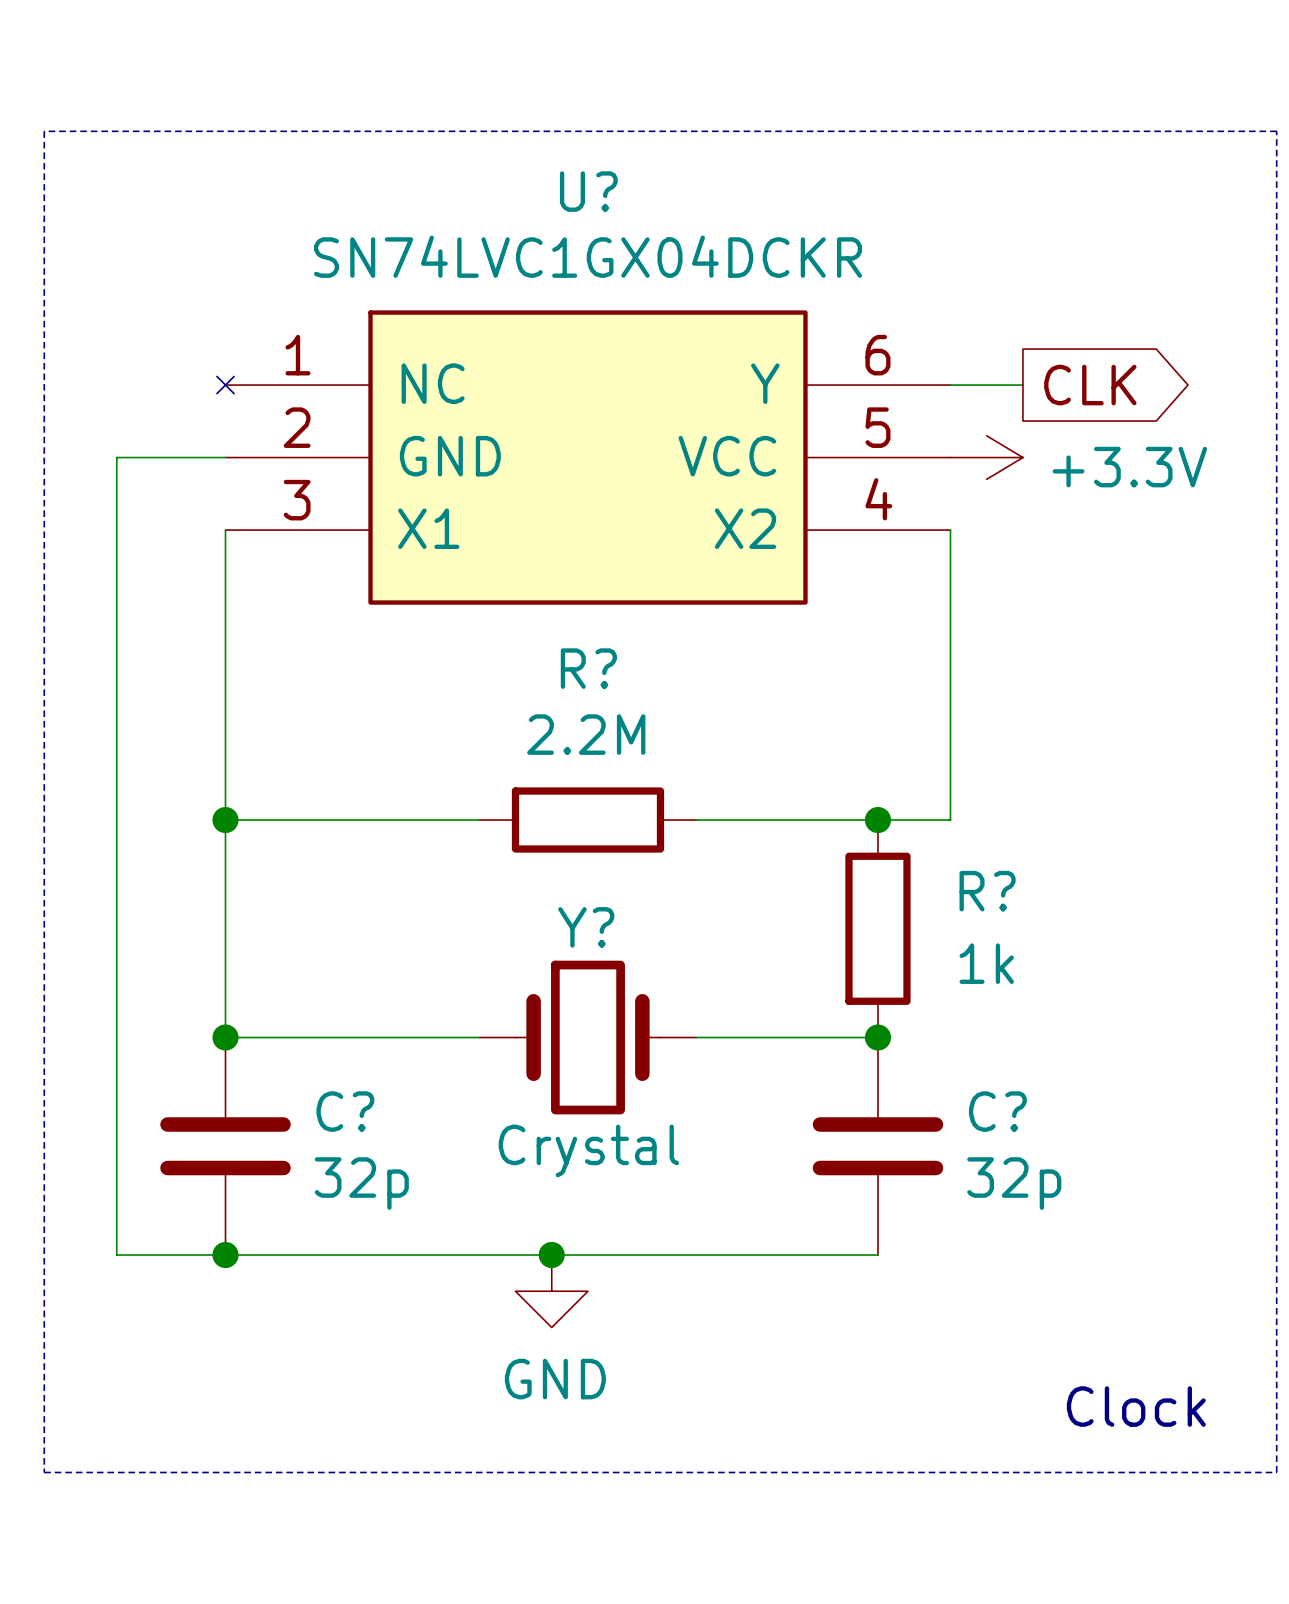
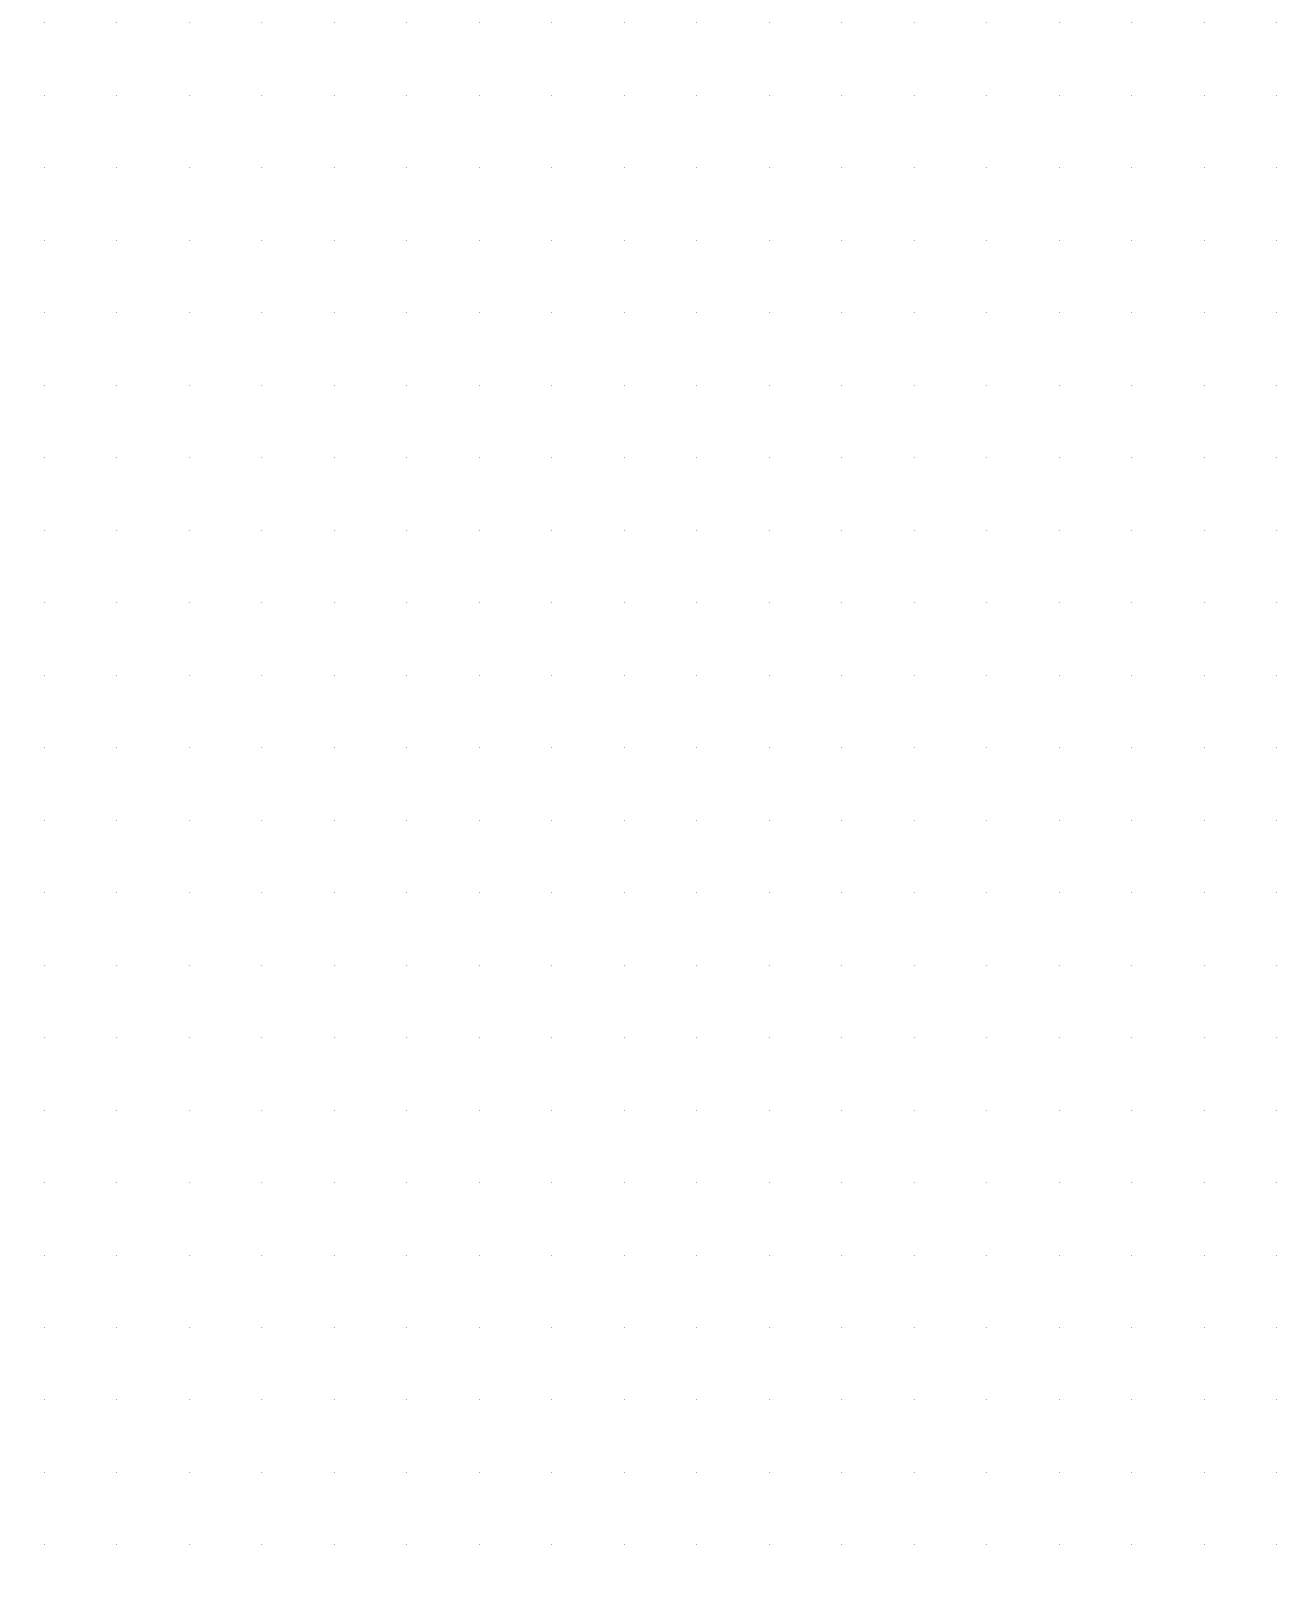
line: (44, 131) (1276, 131) (1276, 1472) (44, 1472) (44, 131) -> none
wire: (950, 385) (1022, 385) -> none
global label: CLK (1090, 385) -> none
wire: (225, 457) (116, 457) (116, 1255) (877, 1255) -> none
U?: SN74LVC1GX04DCKR (583, 457) -> none
power symbol: +3.3V (986, 457) -> none
wire: (225, 530) (225, 1037) (479, 1037) -> none
wire: (950, 530) (950, 820) (696, 820) -> none
wire: (225, 820) (479, 820) -> none
junction: (225, 820) -> none
R?: 2.2M (587, 820) -> none
junction: (877, 820) -> none
R?: 1k (877, 928) -> none
junction: (225, 1037) -> none
Y?: Crystal (587, 1037) -> none
wire: (696, 1037) (877, 1037) -> none
junction: (877, 1037) -> none
C?: 32p (225, 1146) -> none
C?: 32p (877, 1146) -> none
junction: (225, 1255) -> none
junction: (551, 1255) -> none
power symbol: GND (551, 1291) -> none
text: Clock (1136, 1406) -> none

